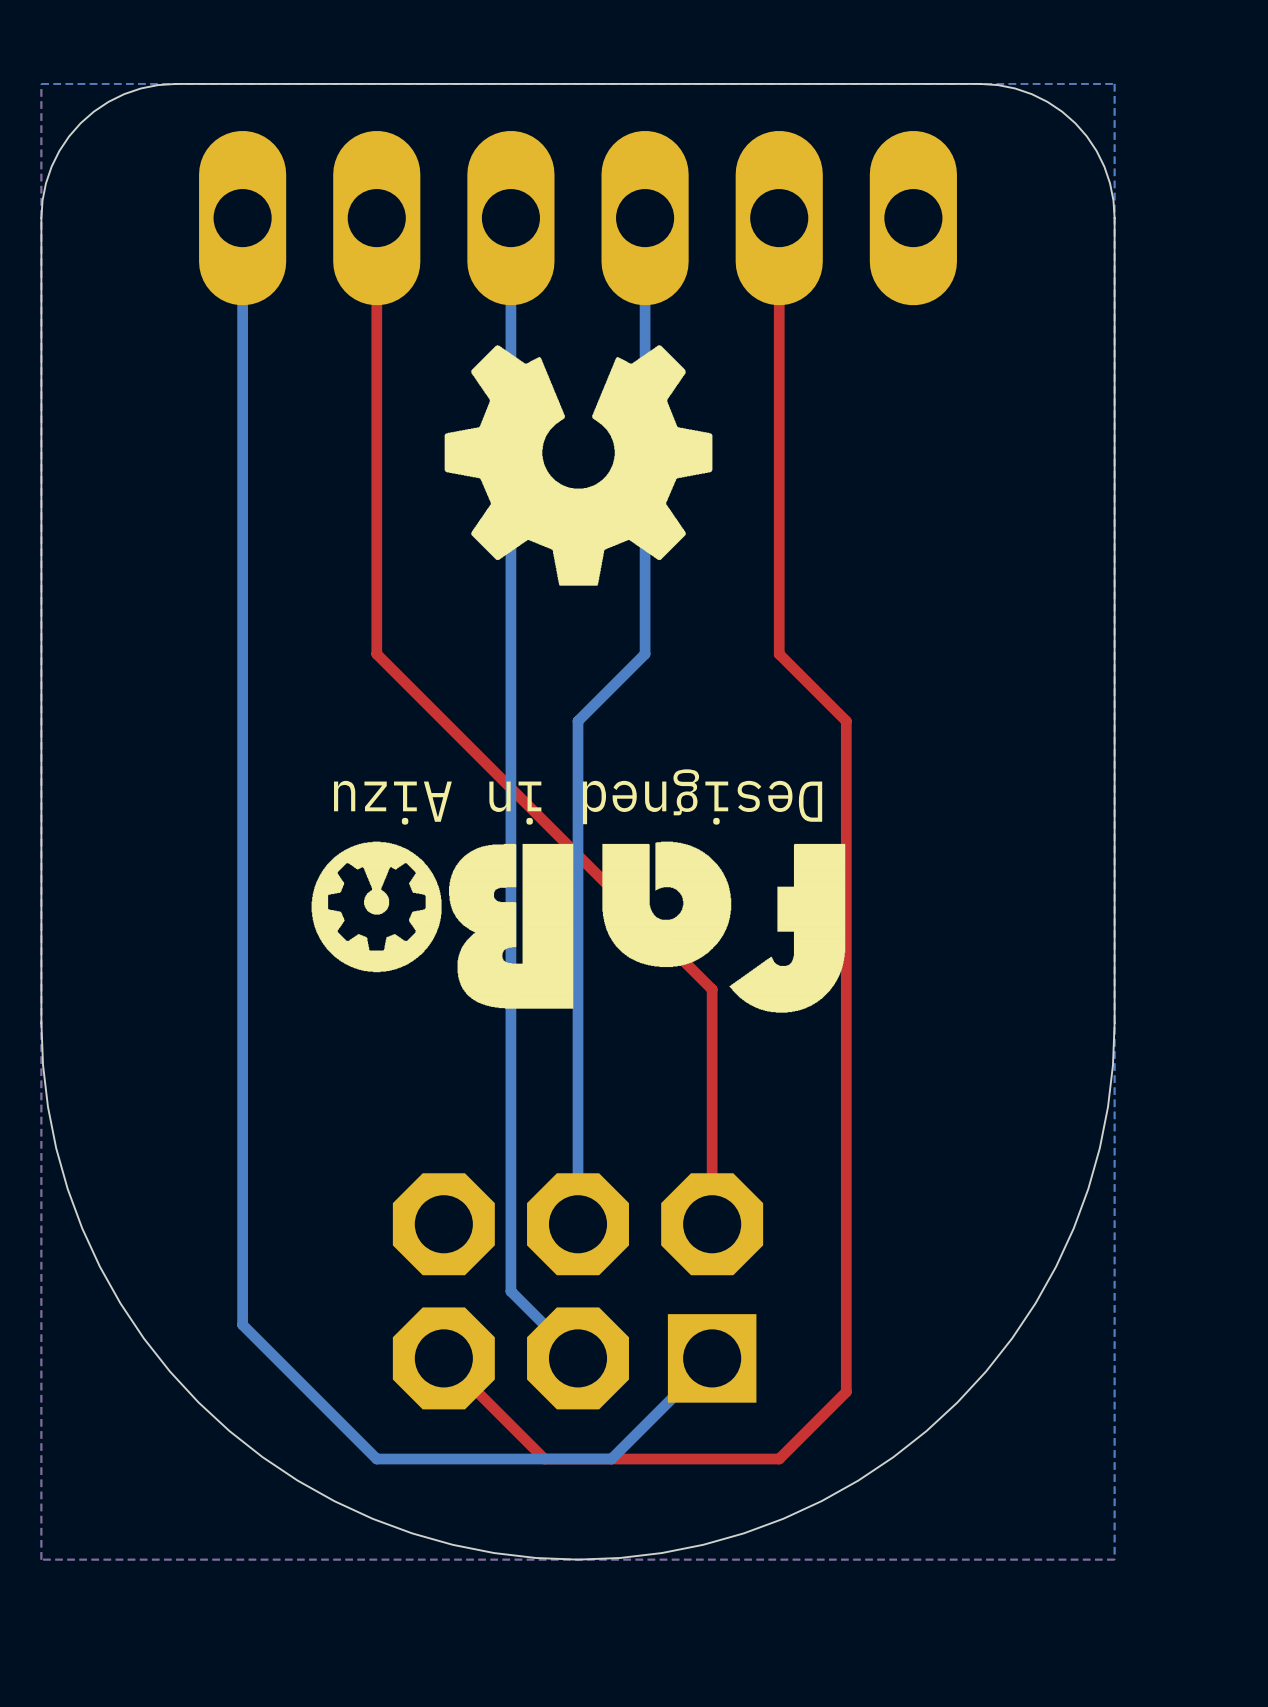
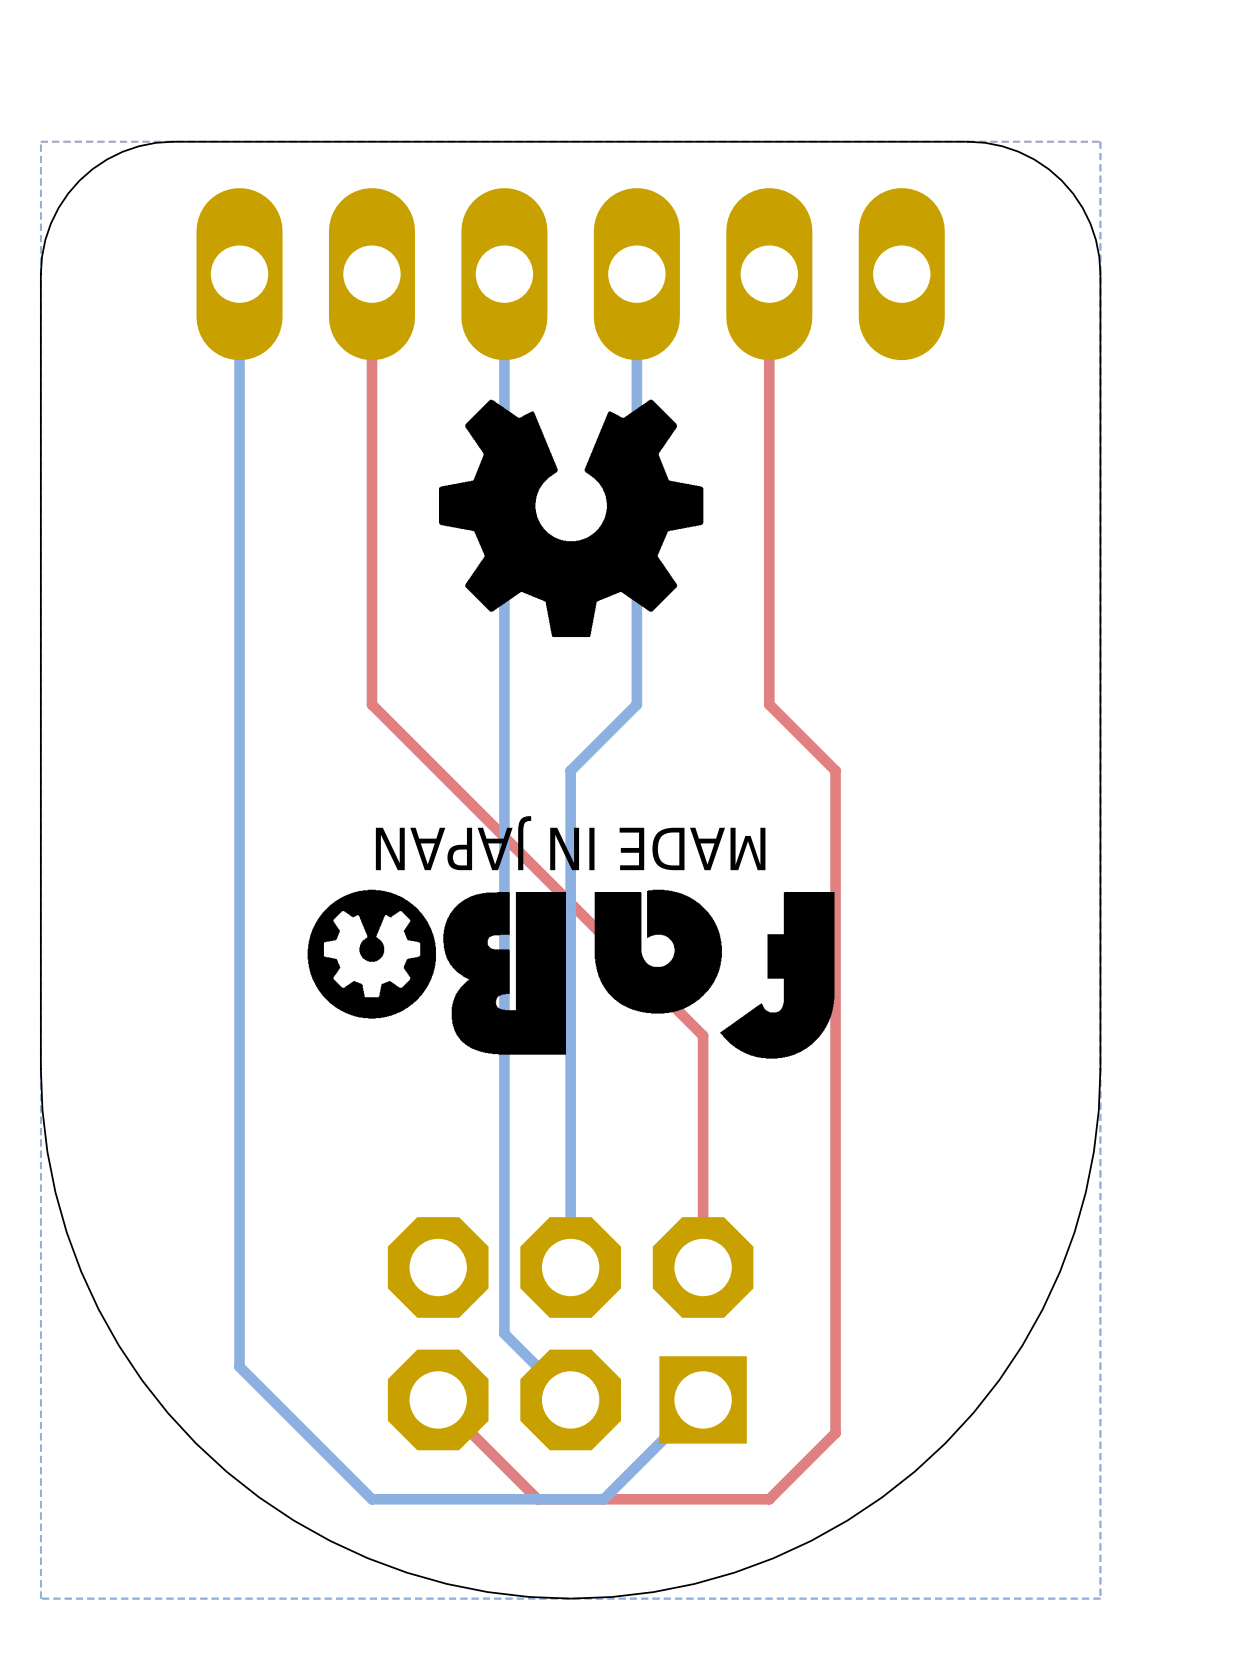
text: Designed in Aizu (578, 796) -> MADE IN JAPAN (570, 843)

